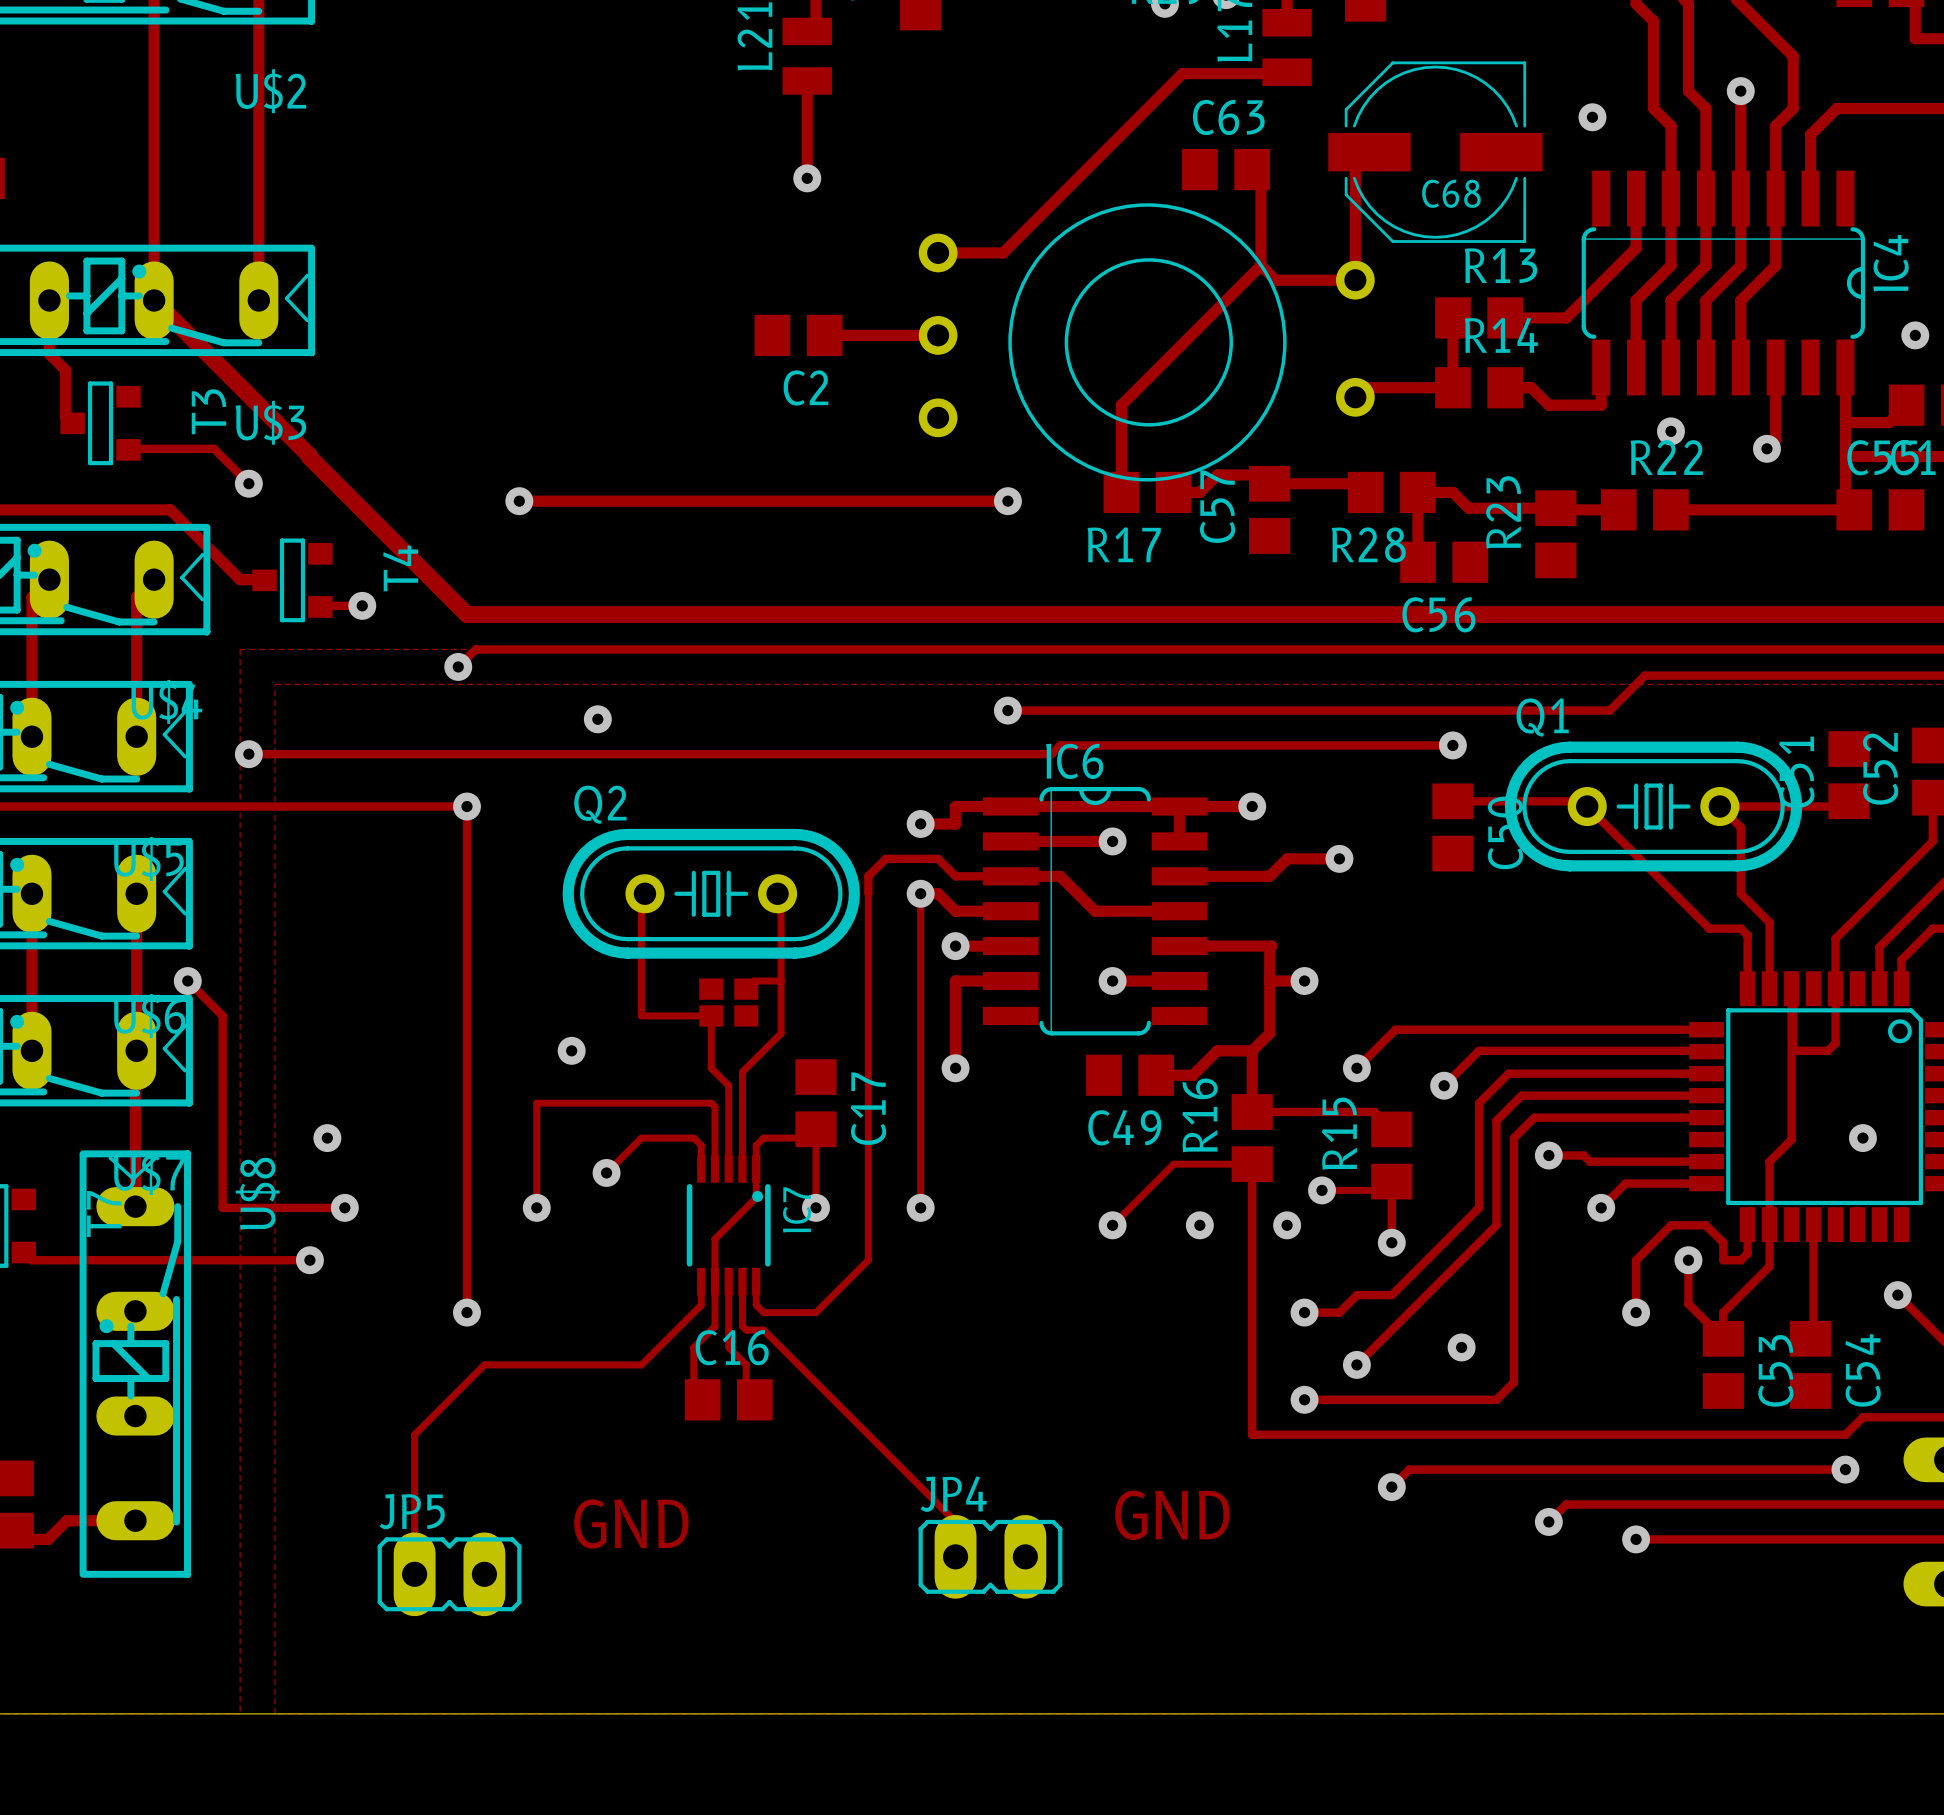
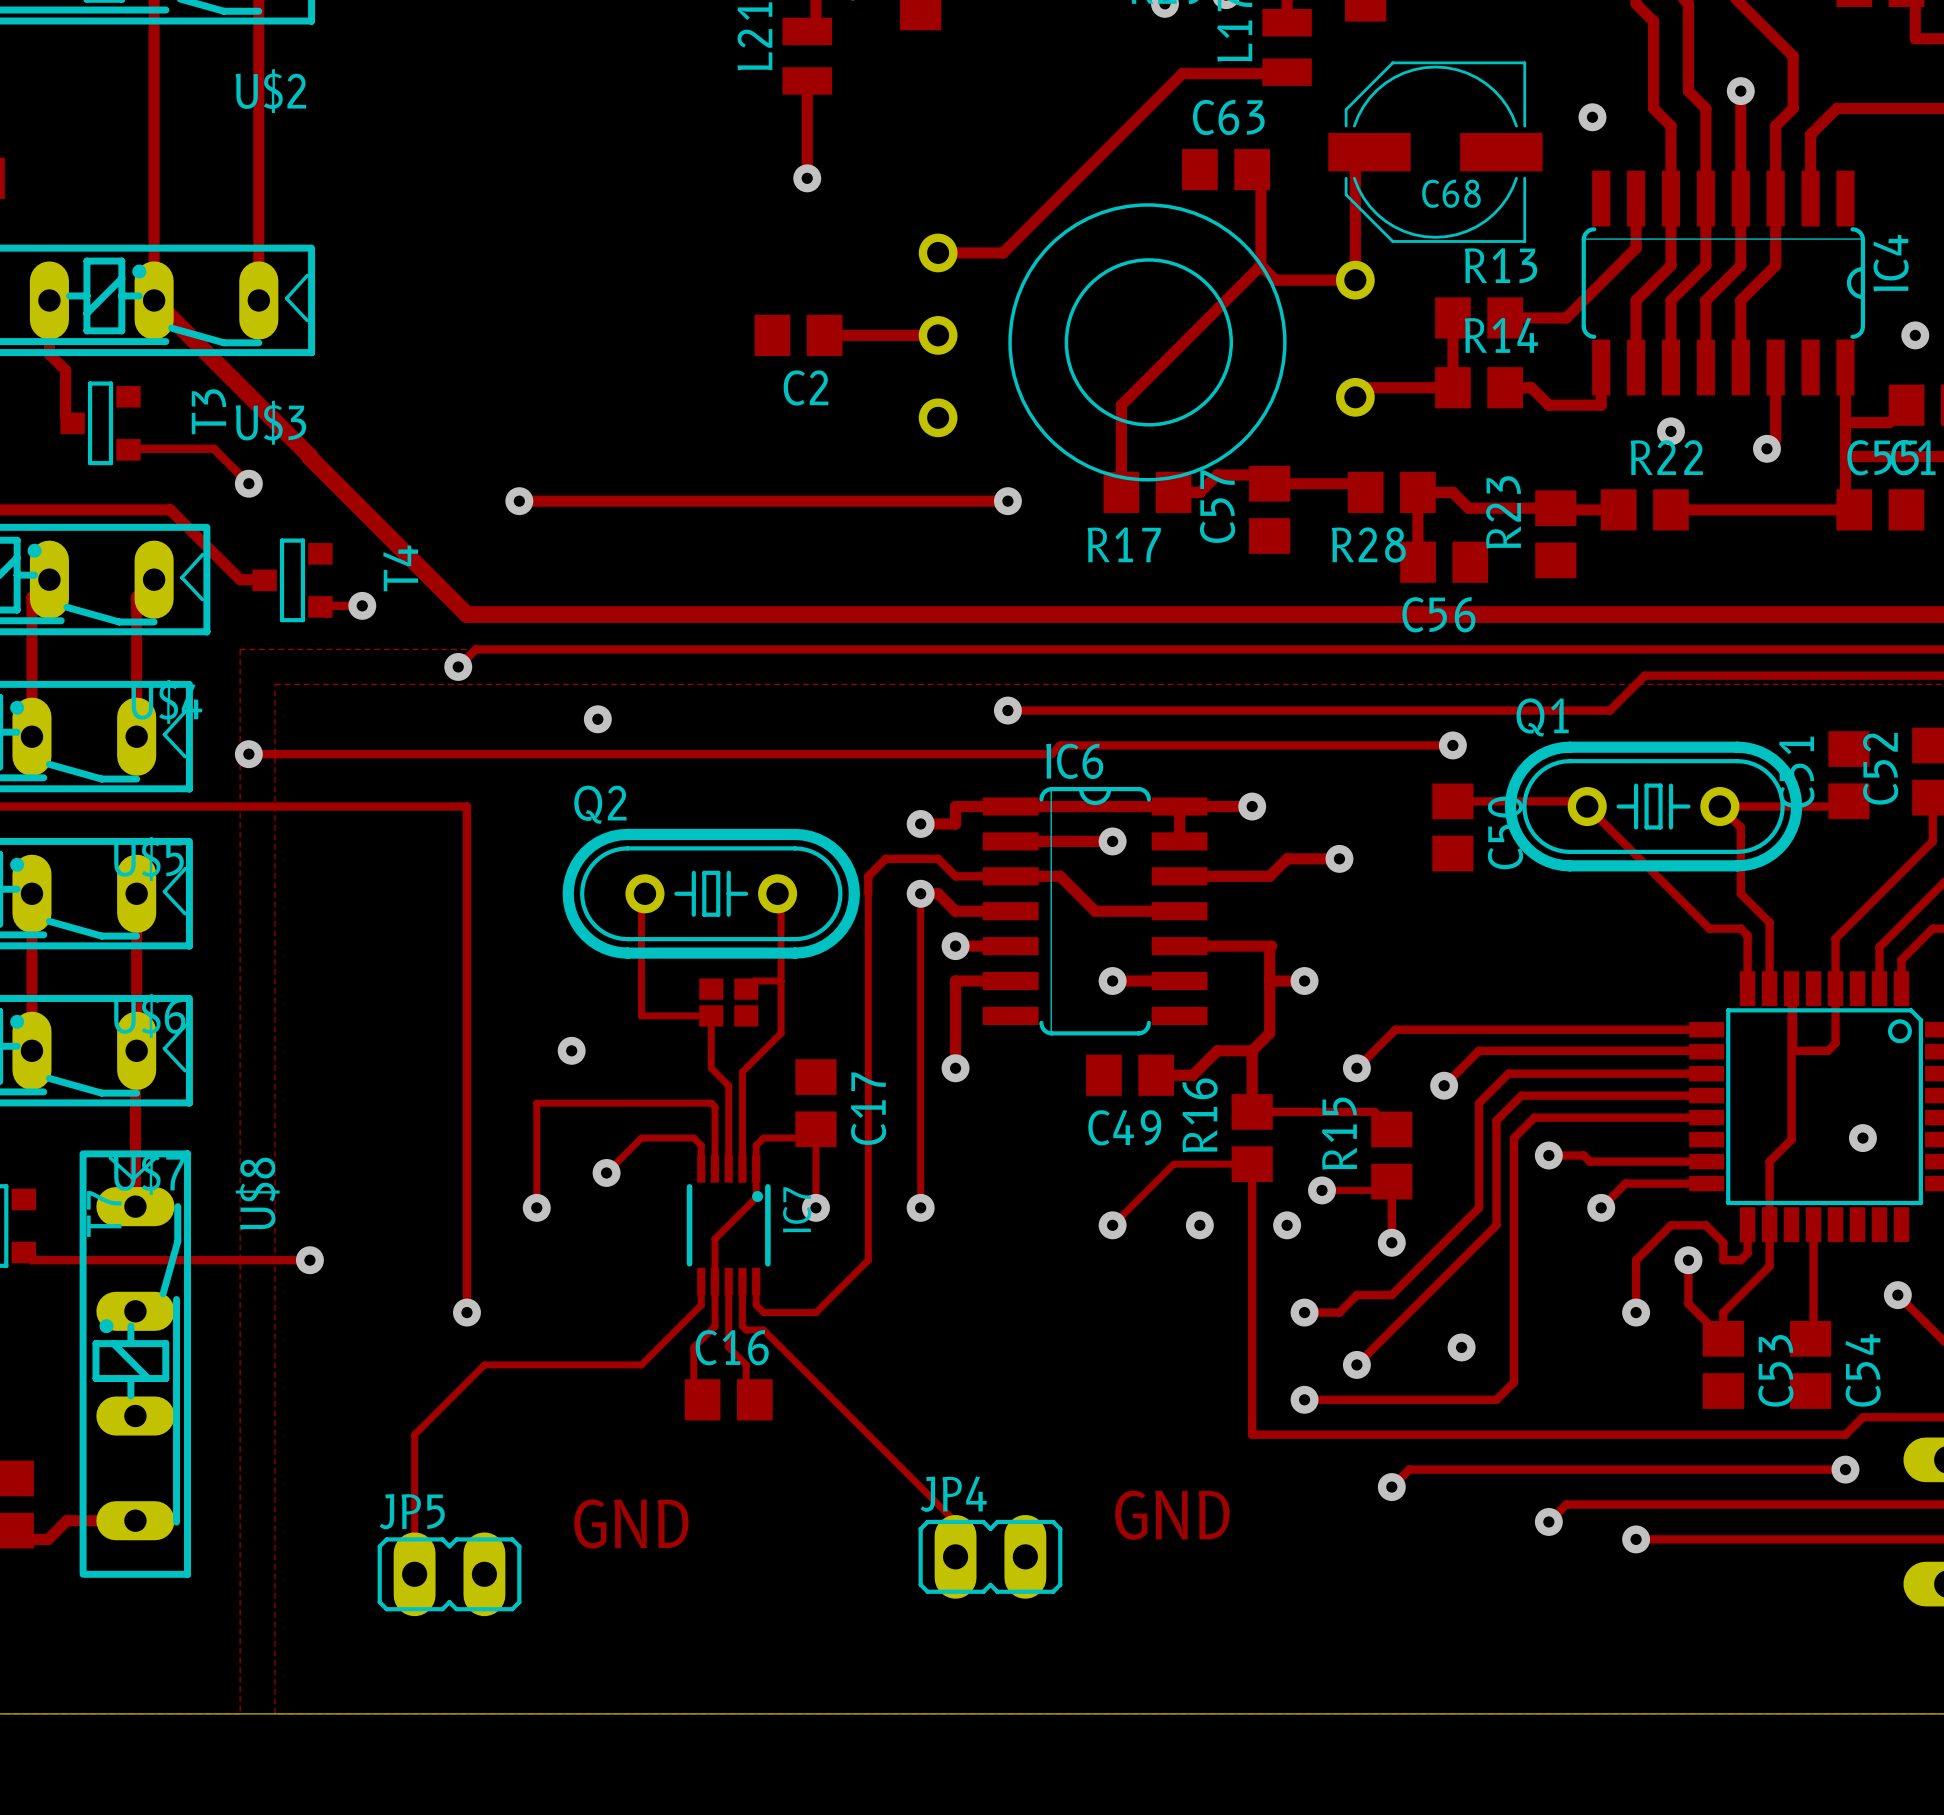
via: (466, 806) -> none
track: (187, 981) (222, 1015) (222, 1207) (344, 1207) -> none
via: (187, 981) -> none
via: (327, 1138) -> none
via: (344, 1207) -> none

